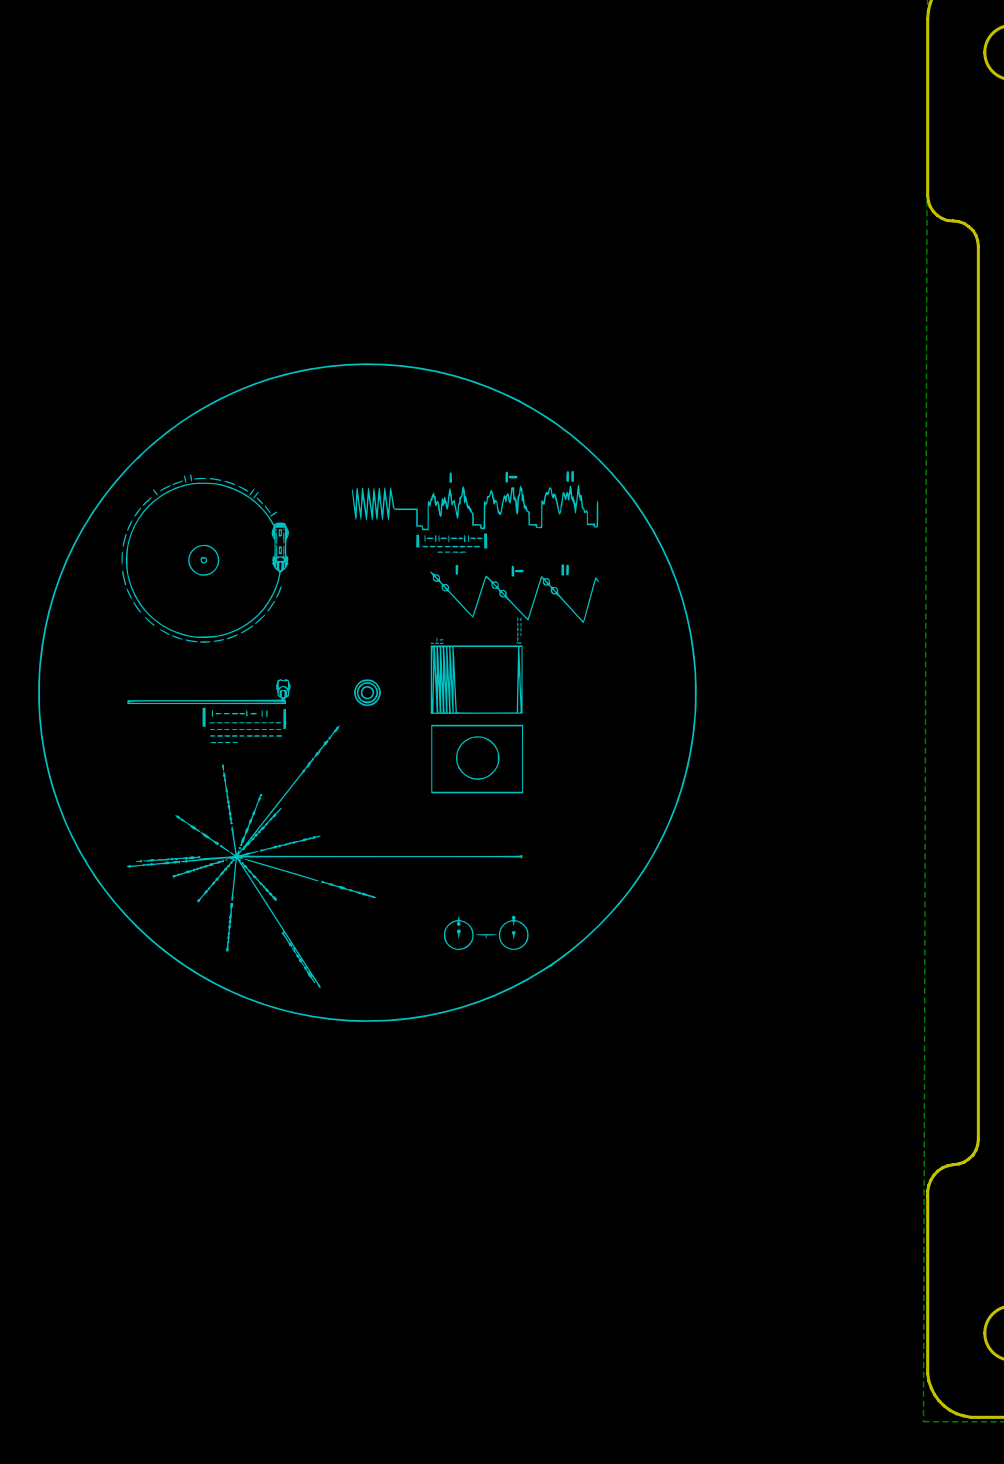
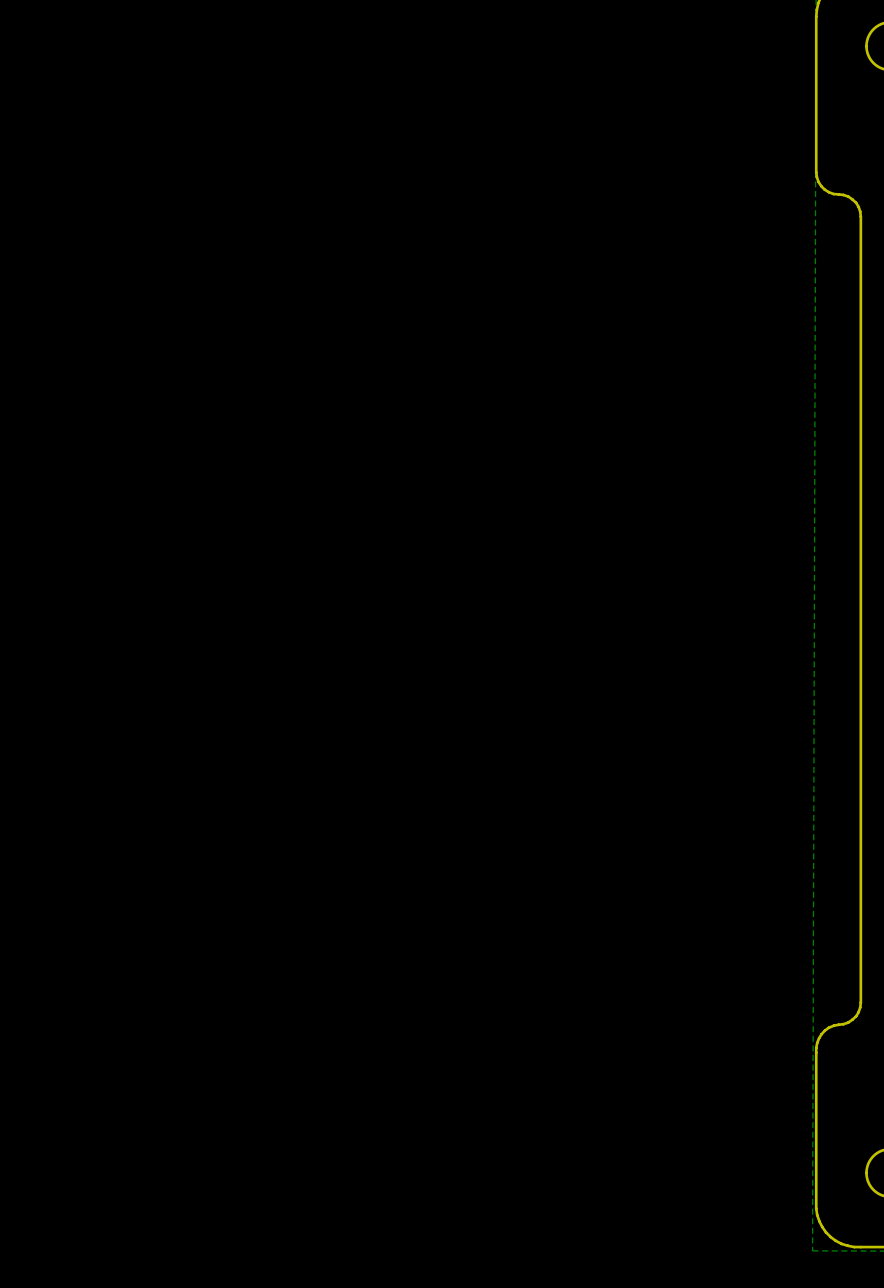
drawing: [38, 363, 697, 1022] -> none

